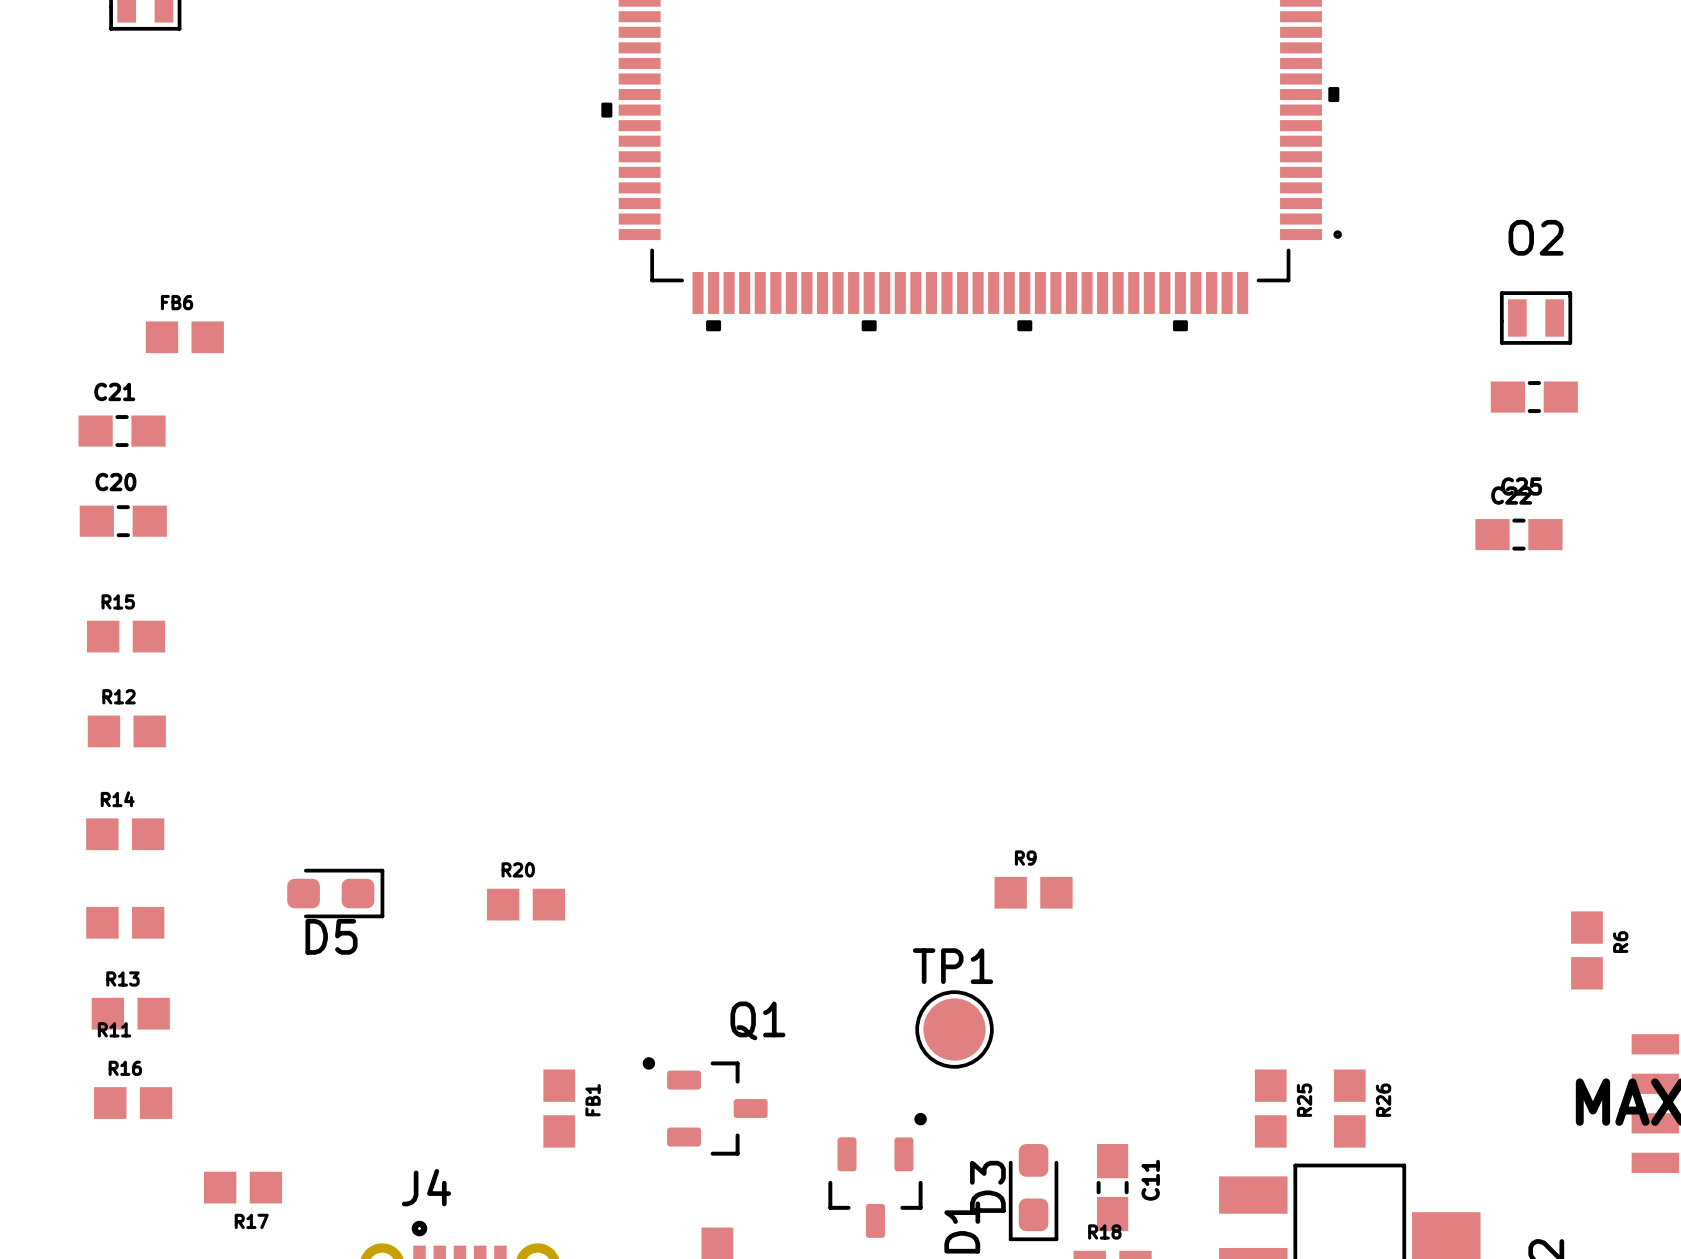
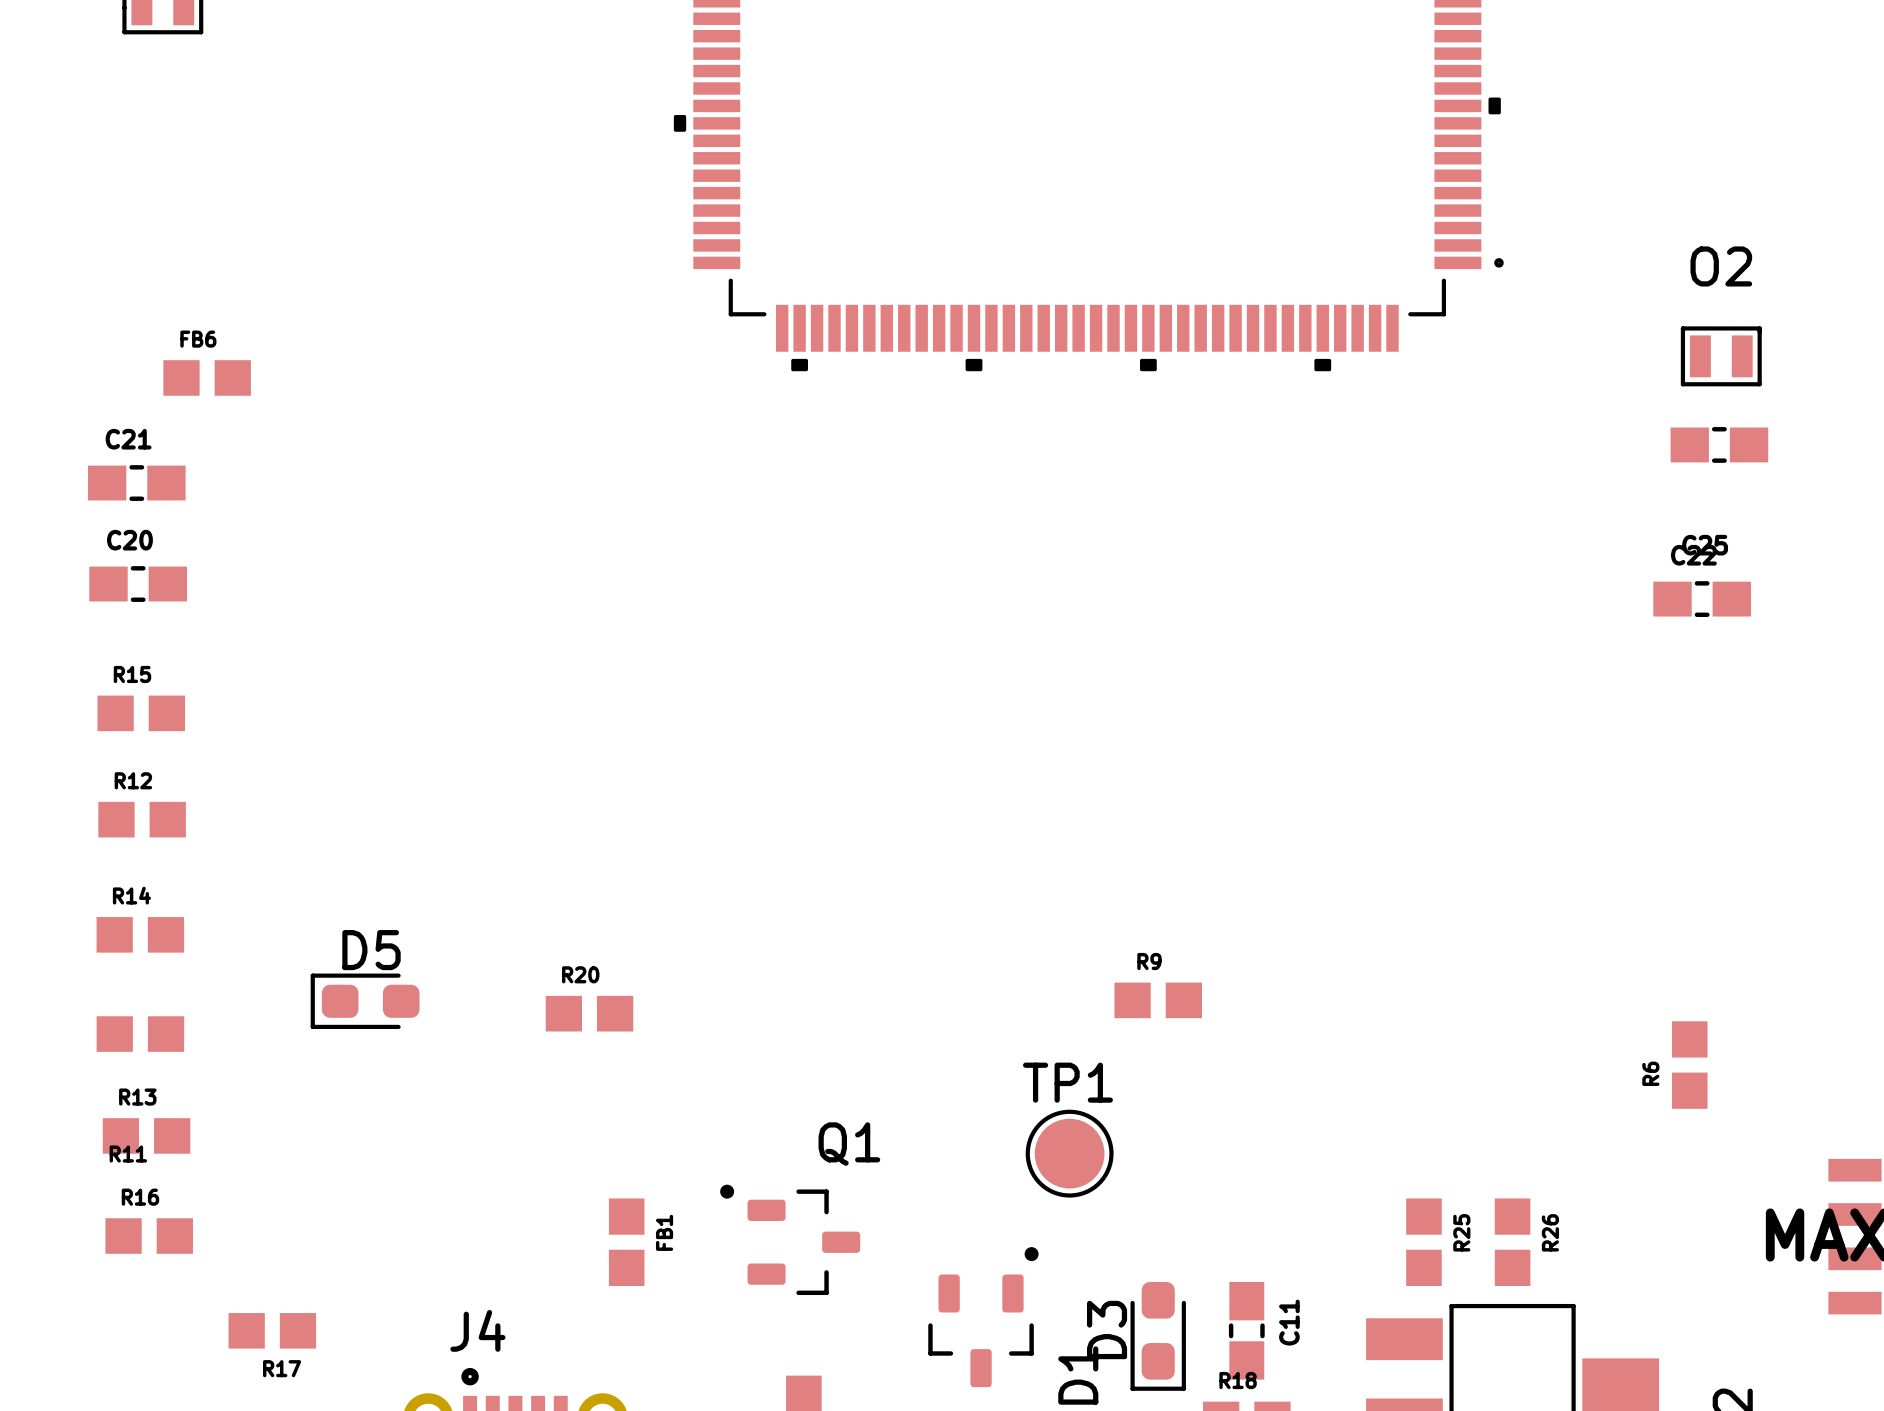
D5 rotation: 0° (335, 893) -> 180° (365, 1001)
R6 name position: R6 (1620, 942) -> R6 (1650, 1073)
R6 position: (1586, 950) -> (1689, 1065)

